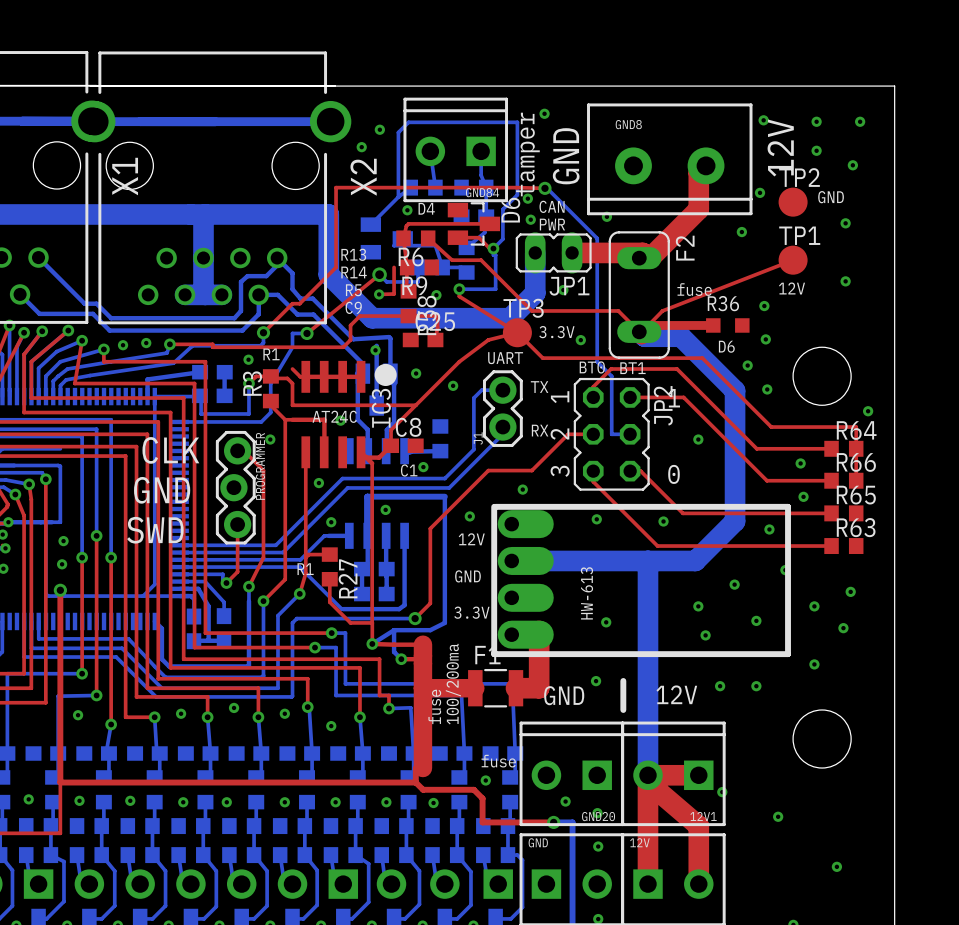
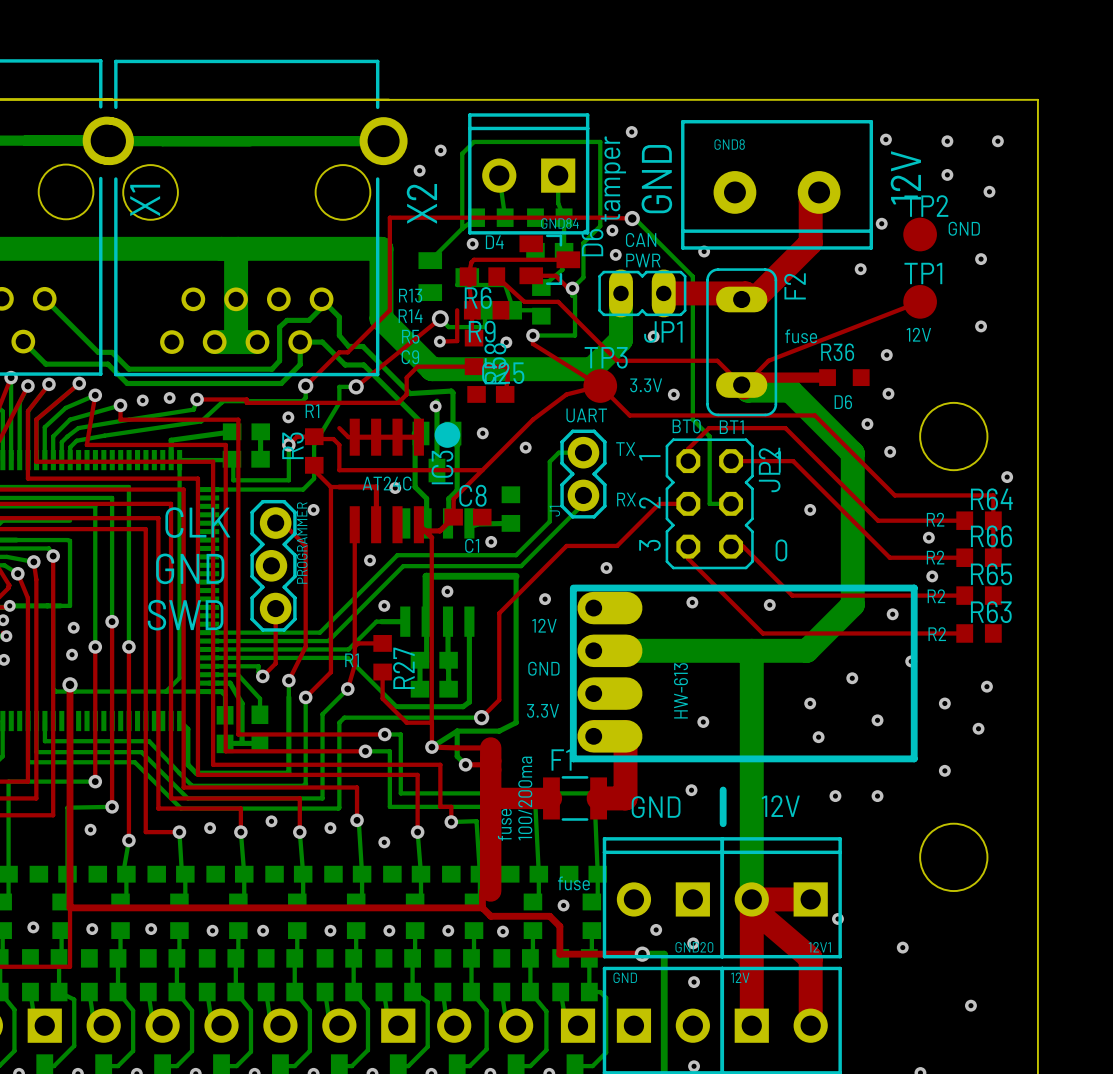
text: none -> R2 (935, 519)
text: none -> R2 (935, 557)
text: none -> R2 (936, 596)
text: none -> R2 (937, 634)

